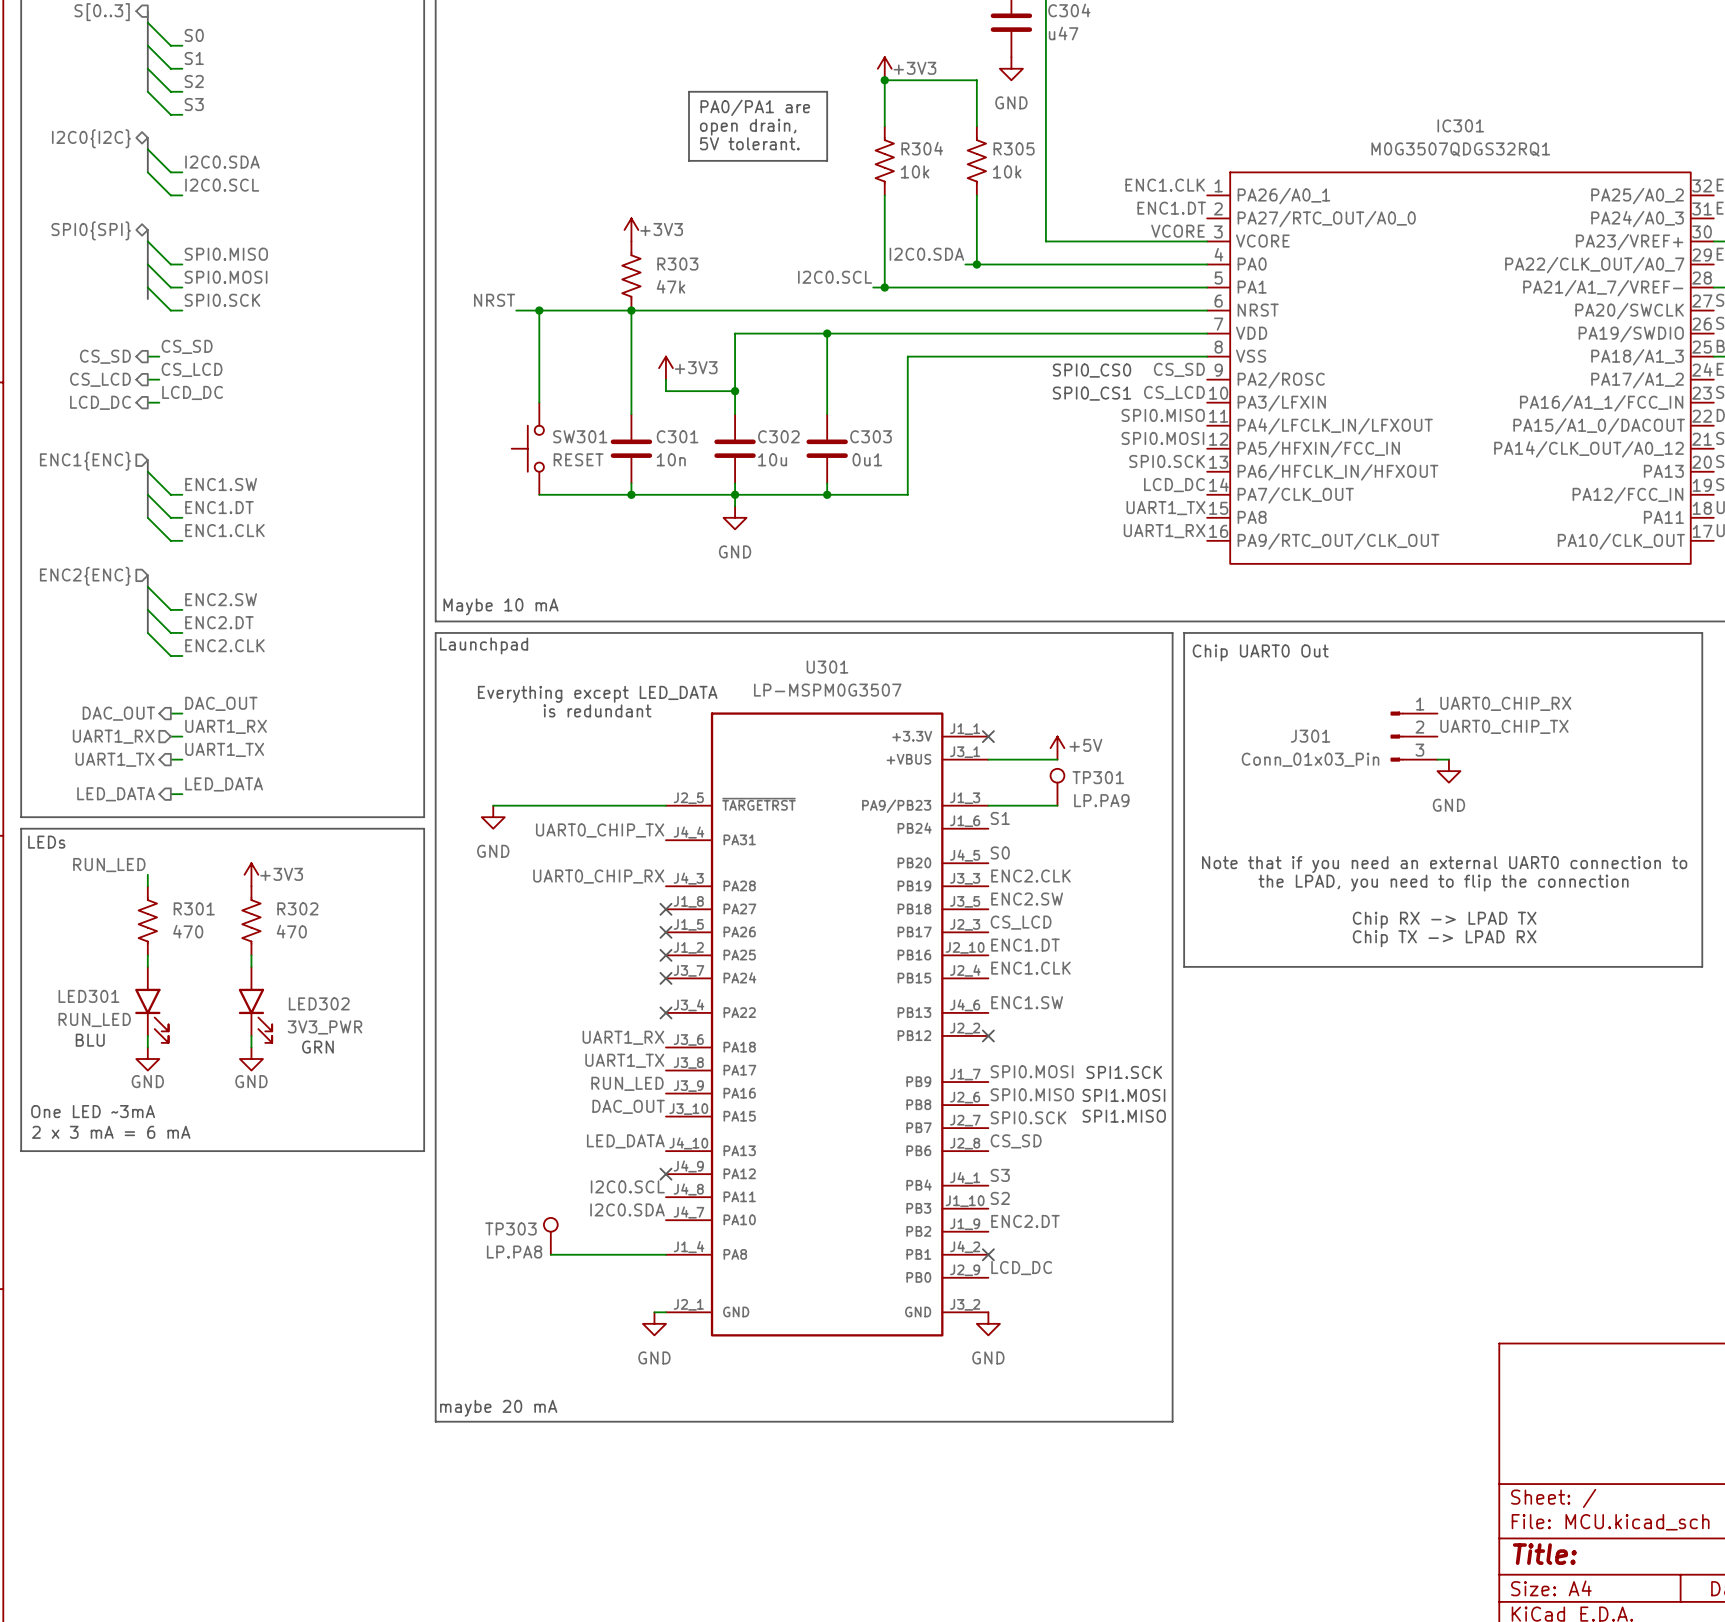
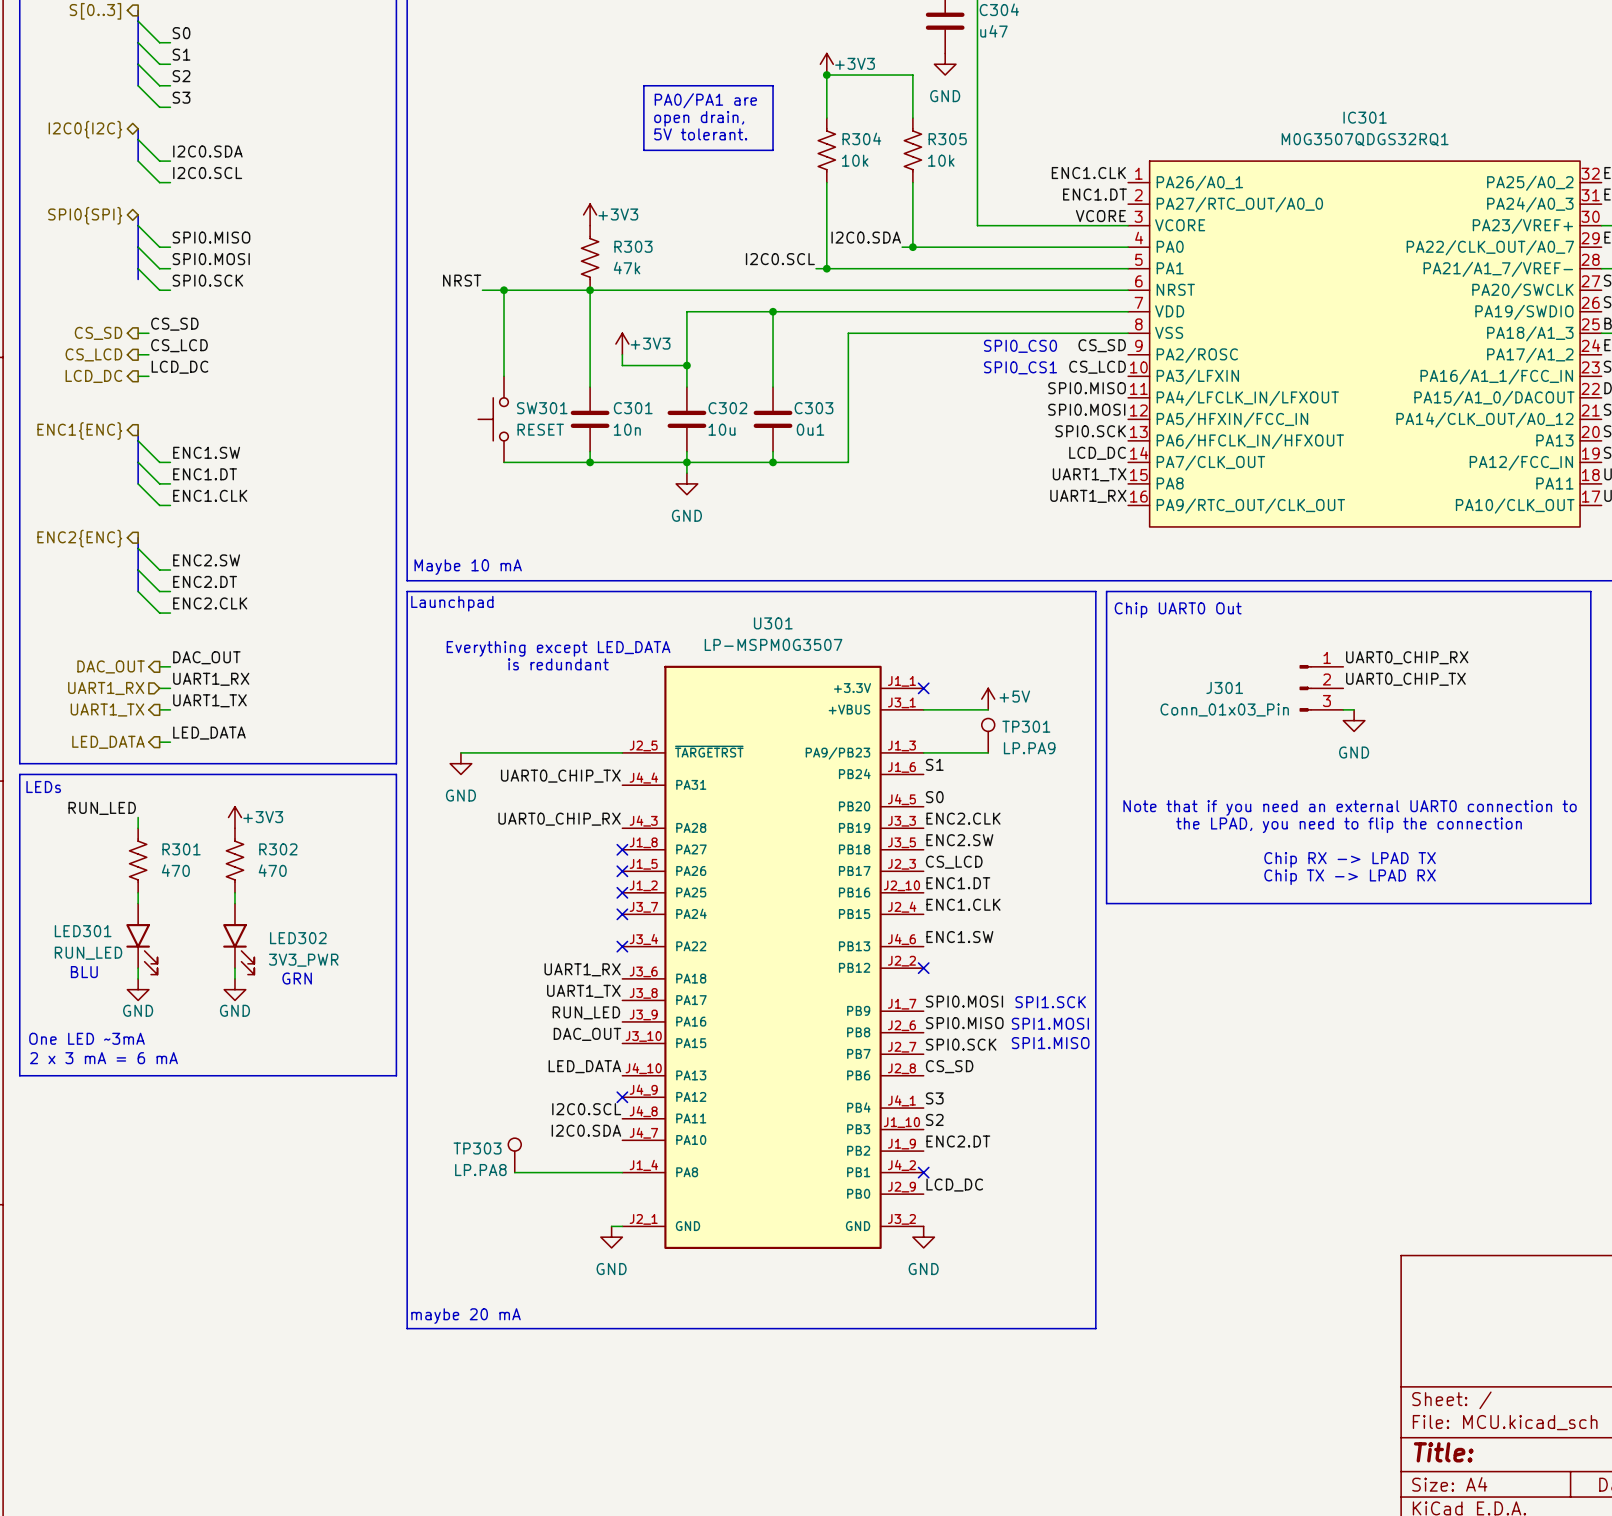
hierarchical label shape: input (85, 461) -> output (79, 430)
hierarchical label shape: input (85, 576) -> output (79, 538)

